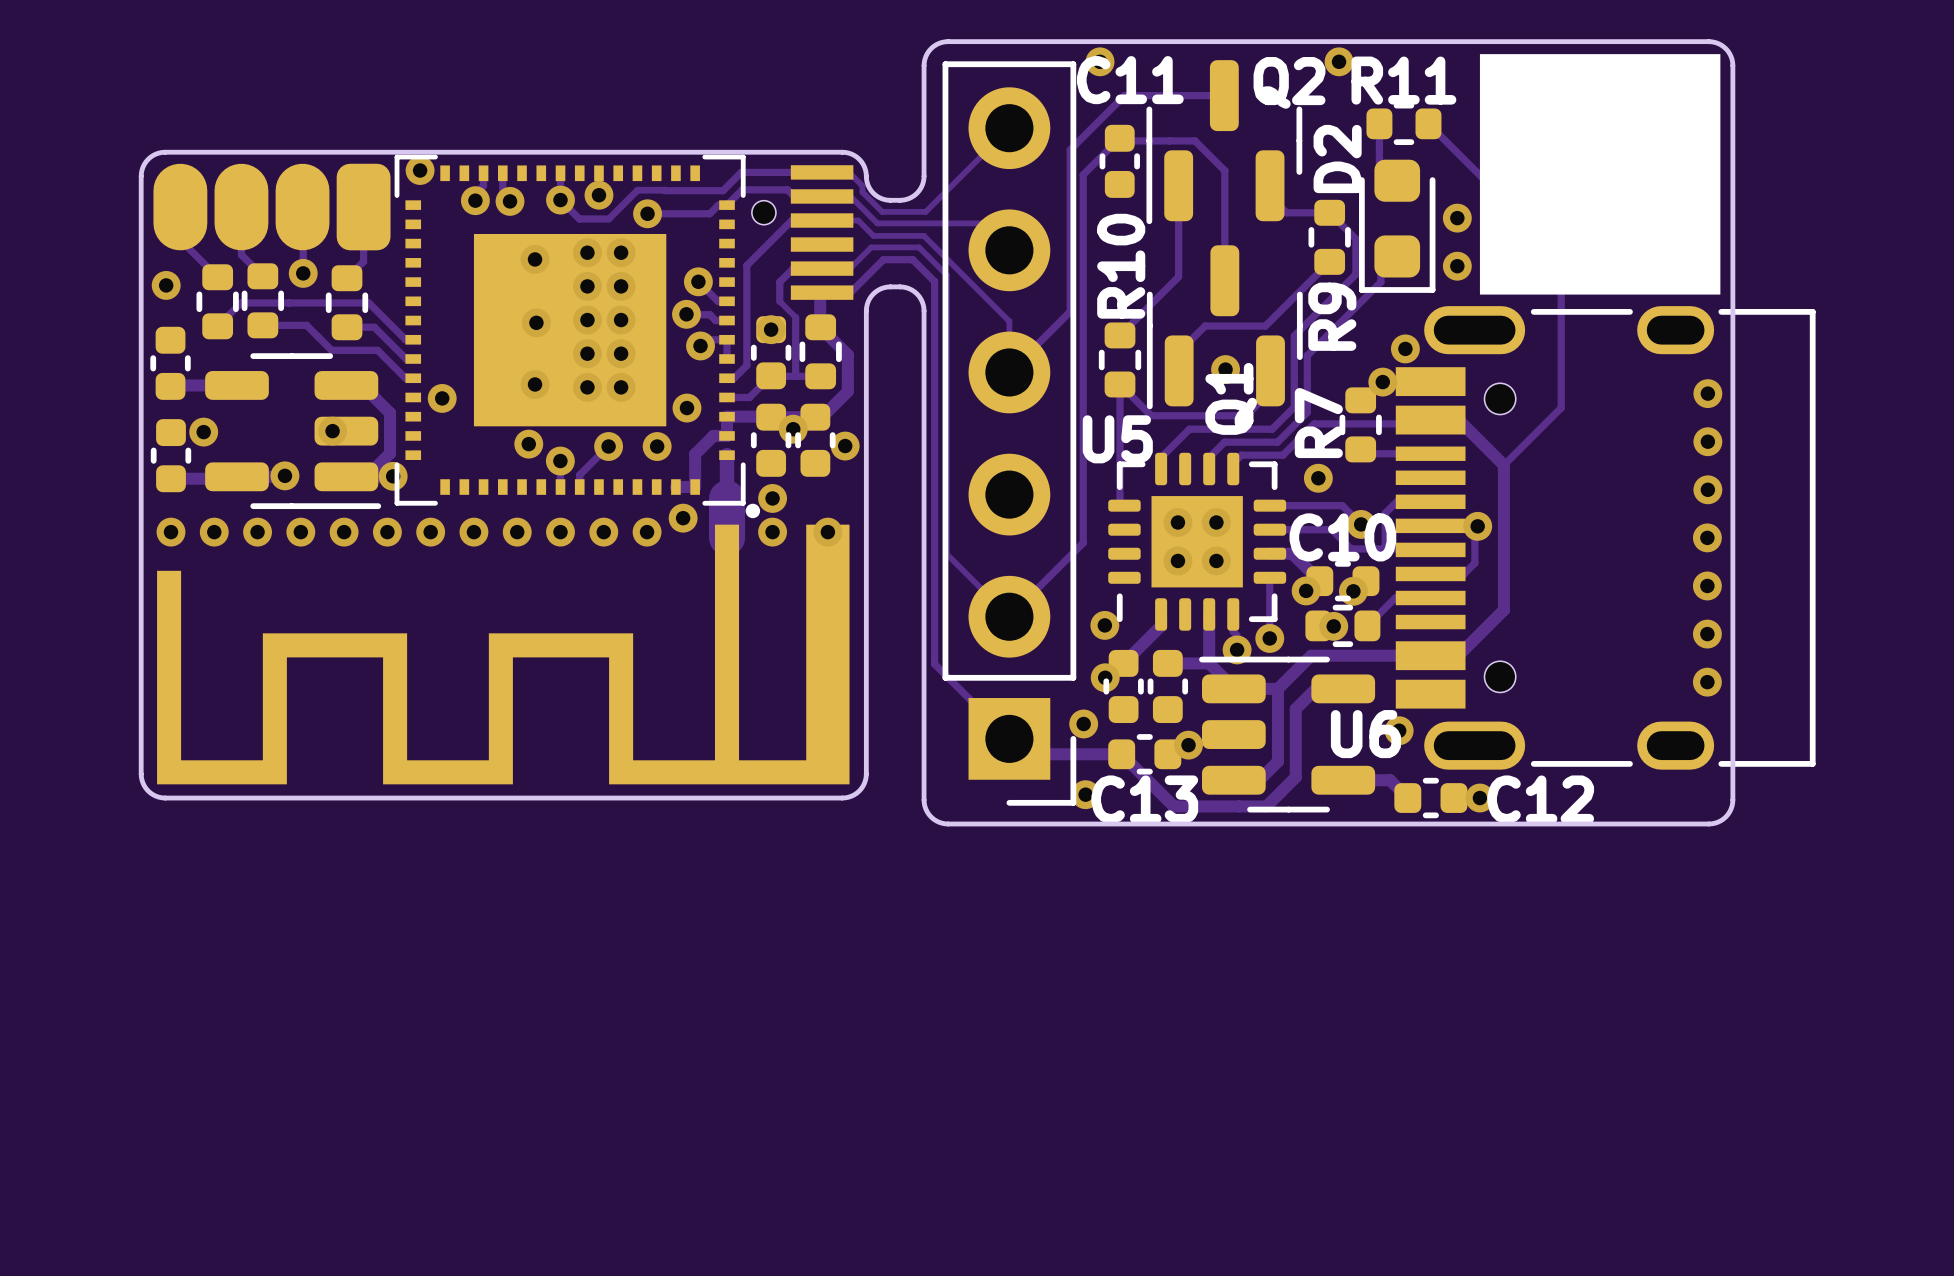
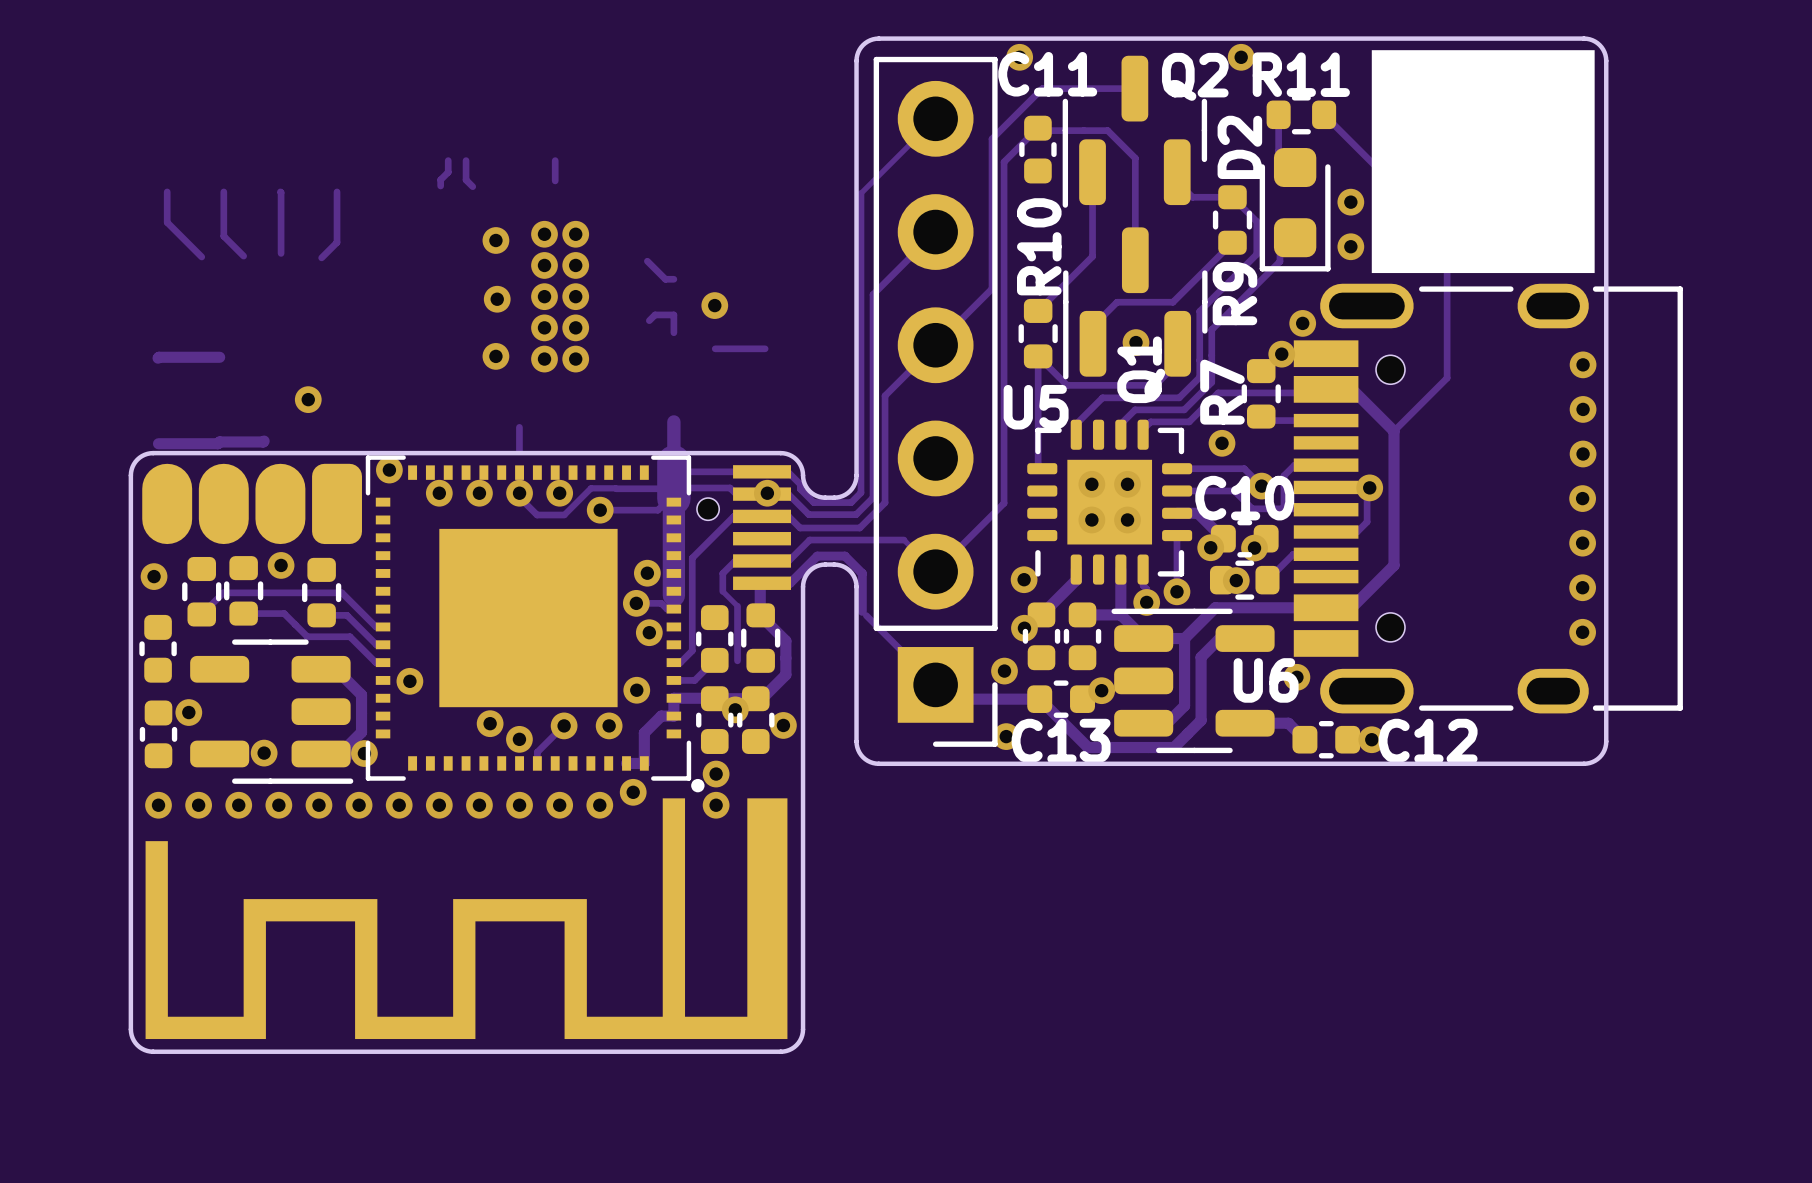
via: (420, 170) -> none
track: (560, 173) (560, 200) (579, 219) (608, 219) (637, 190) (664, 190) -> (519, 472) (519, 497) (537, 515) (564, 515) (591, 488) (615, 488)
board edge: (924, 176) (922, 185) (914, 195) (906, 199) (890, 200) (881, 198) (871, 190) (867, 182) (864, 167) (859, 159) (851, 154) (842, 152) (165, 152) (156, 154) (146, 161) (141, 176) (141, 512) -> (856, 475) (854, 483) (849, 491) (842, 495) (834, 497) (819, 496) (811, 493) (804, 483) (802, 469) (798, 461) (791, 456) (780, 453) (153, 453) (144, 454) (137, 459) (132, 466) (130, 475)
track: (664, 190) (723, 190) (741, 172) (849, 172) (862, 185) (862, 192) (882, 211) (925, 211) (928, 208) -> (616, 488) (670, 488) (687, 471) (787, 471) (800, 484) (800, 489) (813, 502) (851, 502) (860, 492) (860, 193)
via: (598, 195) -> none
via: (475, 200) -> none
via: (560, 200) -> none
via: (510, 201) -> none
part position: (271, 207) -> (252, 503)
part position: (763, 212) -> (708, 509)
track: (647, 213) (709, 213) (718, 205) (727, 205) (742, 189) (787, 189) (794, 196) (850, 196) (877, 223) (982, 223) (1009, 250) -> (600, 510) (657, 510) (665, 502) (673, 502) (688, 487) (730, 487) (736, 494) (788, 494) (808, 514) (856, 514) (873, 497) (873, 294) (935, 232)
via: (647, 213) -> none
track: (822, 220) (858, 220) (873, 235) (923, 235) (1009, 321) (1009, 372) -> (673, 662) (680, 662) (692, 650) (692, 558) (733, 516) (788, 516) (800, 528) (859, 528) (885, 502) (885, 395) (935, 345)
track: (822, 220) (791, 220) (746, 265) (746, 365) (734, 378) (727, 378) -> none
part position: (822, 232) -> (762, 527)
track: (822, 268) (849, 268) (871, 247) (919, 247) (946, 275) (946, 554) (975, 582) -> (737, 660) (737, 606) (722, 591) (722, 573) (735, 560) (788, 560) (809, 540) (903, 540)
track: (822, 268) (793, 268) (779, 282) (779, 301) (795, 317) (795, 376) -> none
via: (303, 273) -> none
via: (698, 281) -> none
via: (166, 285) -> none
part: (262, 300) -> none
part: (217, 301) -> none
part: (347, 302) -> none
board edge: (924, 310) (922, 301) (917, 293) (909, 288) (900, 286) (887, 287) (878, 290) (869, 298) (866, 307) (866, 633) -> (856, 288) (856, 163)
track: (686, 314) (709, 314) (715, 320) (727, 320) -> none
via: (686, 314) -> none
track: (262, 325) (306, 325) (331, 350) (377, 350) (405, 378) (413, 378) -> (243, 613) (284, 613) (307, 636) (350, 636) (375, 662) (383, 662)
track: (217, 326) (240, 302) (368, 302) (405, 339) (413, 339) -> (201, 614) (223, 592) (341, 592) (376, 626) (383, 626)
track: (347, 327) (374, 327) (406, 359) (413, 359) -> (321, 615) (347, 615) (376, 644) (383, 644)
part position: (570, 330) -> (528, 618)
via: (700, 345) -> none
part: (820, 351) -> none
part: (771, 352) -> none
part: (170, 363) -> none
track: (771, 375) (749, 397) (727, 397) -> (714, 660) (694, 680) (673, 680)
track: (346, 385) (362, 385) (390, 413) (390, 453) (366, 476) -> (321, 669) (335, 669) (361, 694) (361, 732) (339, 753)
via: (442, 398) -> none
via: (686, 408) -> none
track: (770, 416) (727, 416) (727, 435) (713, 435) (695, 454) (695, 487) (675, 487) -> (714, 698) (673, 698) (673, 716) (661, 716) (644, 733) (644, 763) (626, 763)
track: (771, 417) (822, 417) (847, 391) (847, 354) (820, 327) (820, 294) (822, 292) (850, 292) (883, 259) (912, 259) (934, 281) (934, 664) -> none
via: (793, 429) -> none
part position: (293, 431) -> (271, 711)
via: (203, 432) -> none
part: (771, 440) -> none
part: (815, 440) -> none
via: (528, 444) -> none
track: (608, 446) (579, 474) (579, 487) -> (563, 725) (537, 752) (537, 763)
via: (608, 446) -> none
via: (657, 446) -> none
via: (845, 446) -> none
part: (171, 455) -> none
via: (560, 461) -> none
via: (284, 475) -> none
via: (393, 476) -> none
via: (772, 498) -> none
drawing position: (752, 510) -> (697, 785)
board edge: (924, 512) (924, 633) -> (803, 586) (804, 578) (809, 571) (816, 566) (825, 564) (840, 565) (847, 569) (854, 578) (856, 586)
via: (683, 518) -> none
via: (171, 532) -> none
via: (214, 532) -> none
via: (257, 532) -> none
via: (300, 532) -> none
via: (344, 532) -> none
via: (387, 532) -> none
via position: (430, 532) -> (389, 470)
via position: (647, 532) -> (600, 510)
via: (772, 532) -> none
via: none -> (281, 565)
via: none -> (647, 573)
via: none -> (154, 576)
part: none -> (243, 590)
part: none -> (201, 591)
part: none -> (321, 592)
track: none -> (636, 603) (661, 603) (667, 609) (673, 609)
via: none -> (636, 603)
part position: (503, 654) -> (466, 918)
track: none -> (862, 611) (862, 573) (844, 556) (817, 556) (790, 583) (762, 583) (760, 585) (760, 615) (785, 640) (785, 674) (762, 698) (714, 698)
via: none -> (649, 632)
part: none -> (760, 638)
part: none -> (714, 638)
part: none -> (158, 648)
via: none -> (409, 681)
via: none -> (636, 690)
via: none -> (735, 709)
via: none -> (188, 712)
board edge: (141, 773) (143, 783) (148, 790) (156, 796) (165, 798) (842, 798) (851, 796) (859, 790) (864, 783) (866, 773) -> (130, 717) (131, 1032) (133, 1040) (139, 1047) (153, 1051) (780, 1051) (791, 1048) (800, 1040) (803, 1029) (803, 717)
part: none -> (714, 720)
part: none -> (755, 720)
via: none -> (490, 723)
via: none -> (783, 725)
via: none -> (564, 725)
via: none -> (609, 725)
part: none -> (158, 734)
via: none -> (519, 739)
via: none -> (264, 753)
via: none -> (364, 753)
via: none -> (716, 774)
via: none -> (633, 792)
via: none -> (158, 805)
via: none -> (198, 805)
via: none -> (238, 805)
via: none -> (278, 805)
via: none -> (318, 805)
via: none -> (359, 805)
via: none -> (399, 805)
via: none -> (439, 805)
via: none -> (479, 805)
via: none -> (519, 805)
via: none -> (559, 805)
via: none -> (599, 805)
via: none -> (716, 805)

